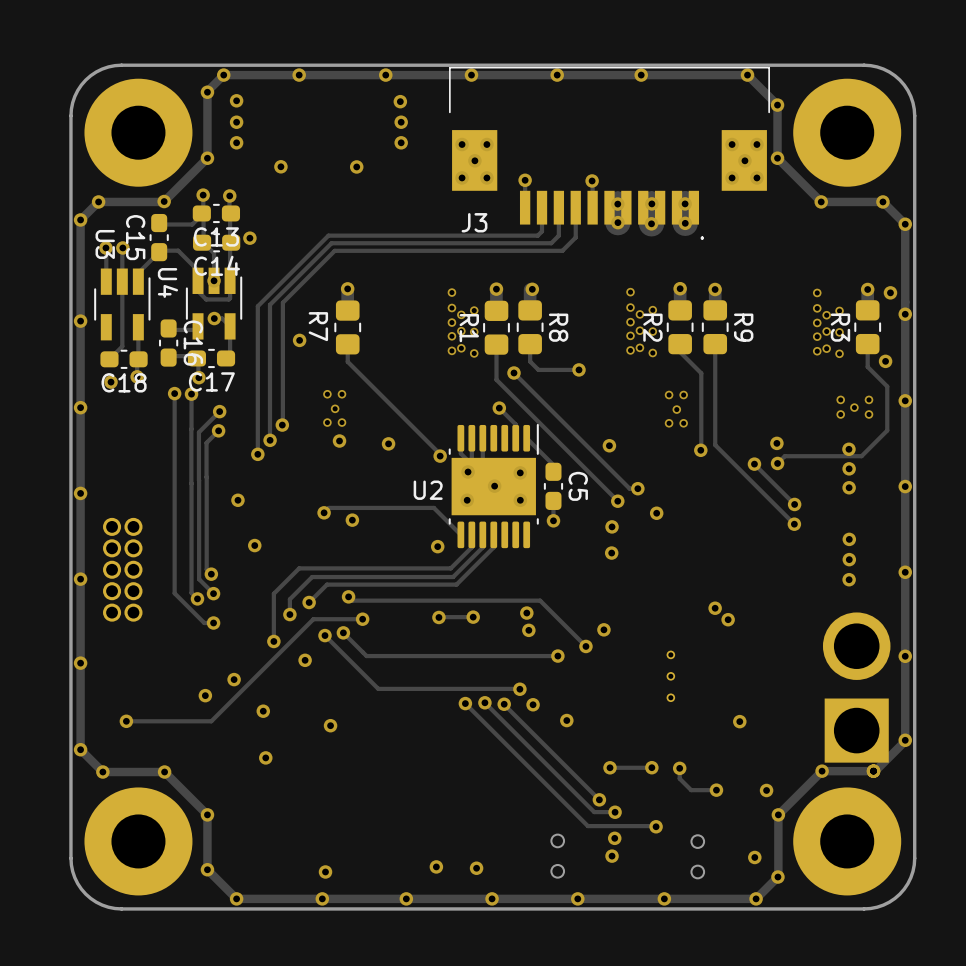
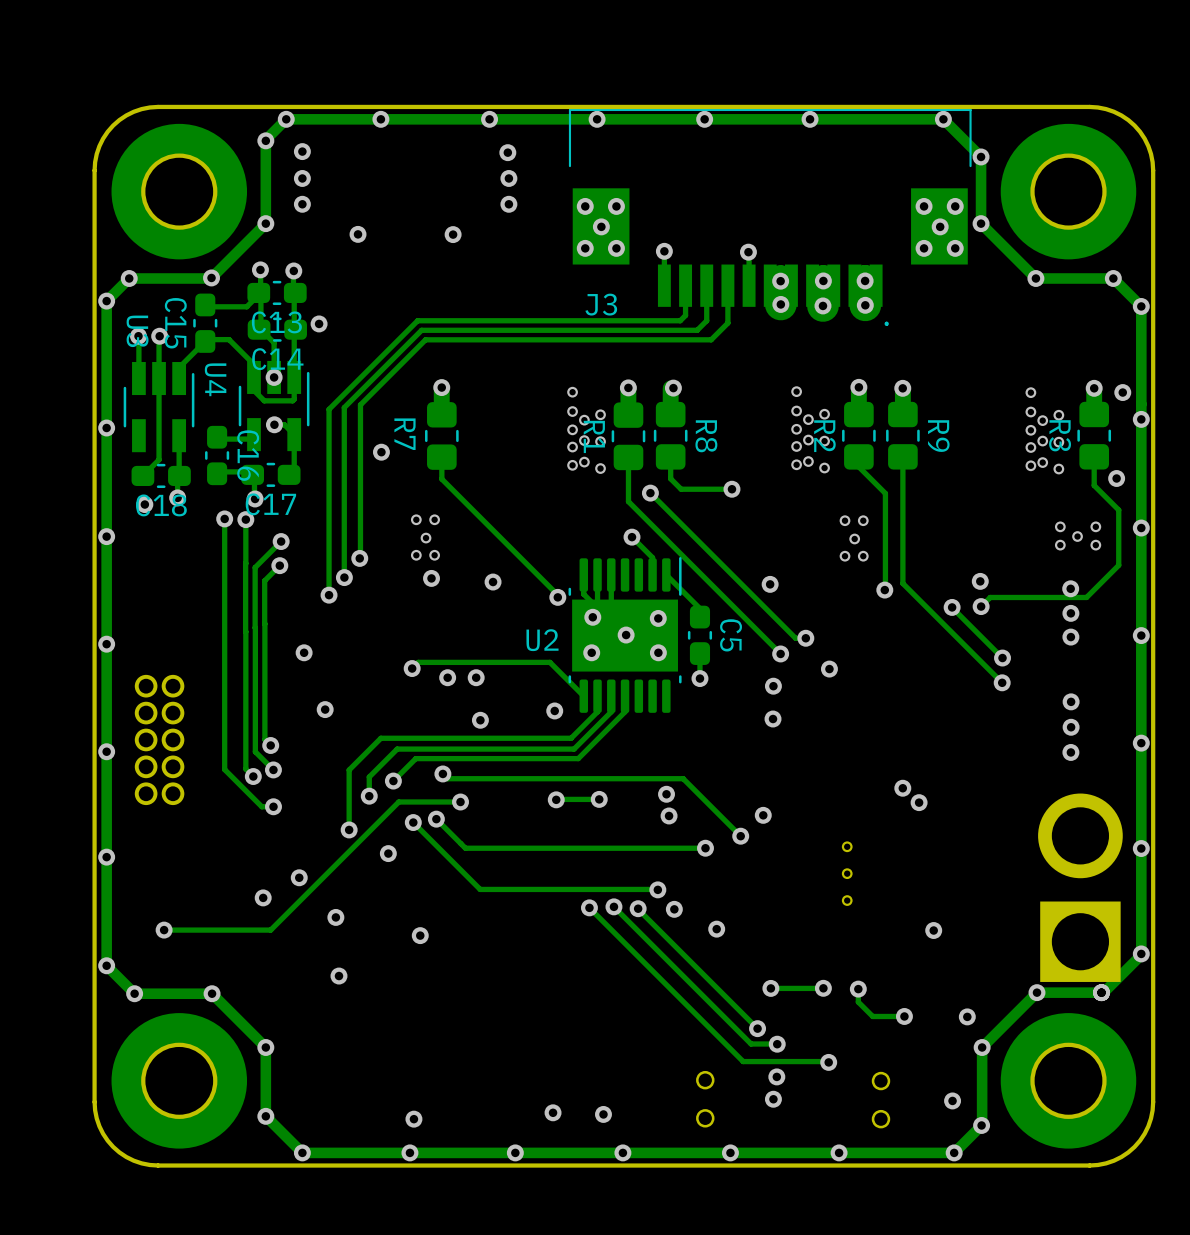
via: none -> (476, 677)
via: none -> (480, 720)

